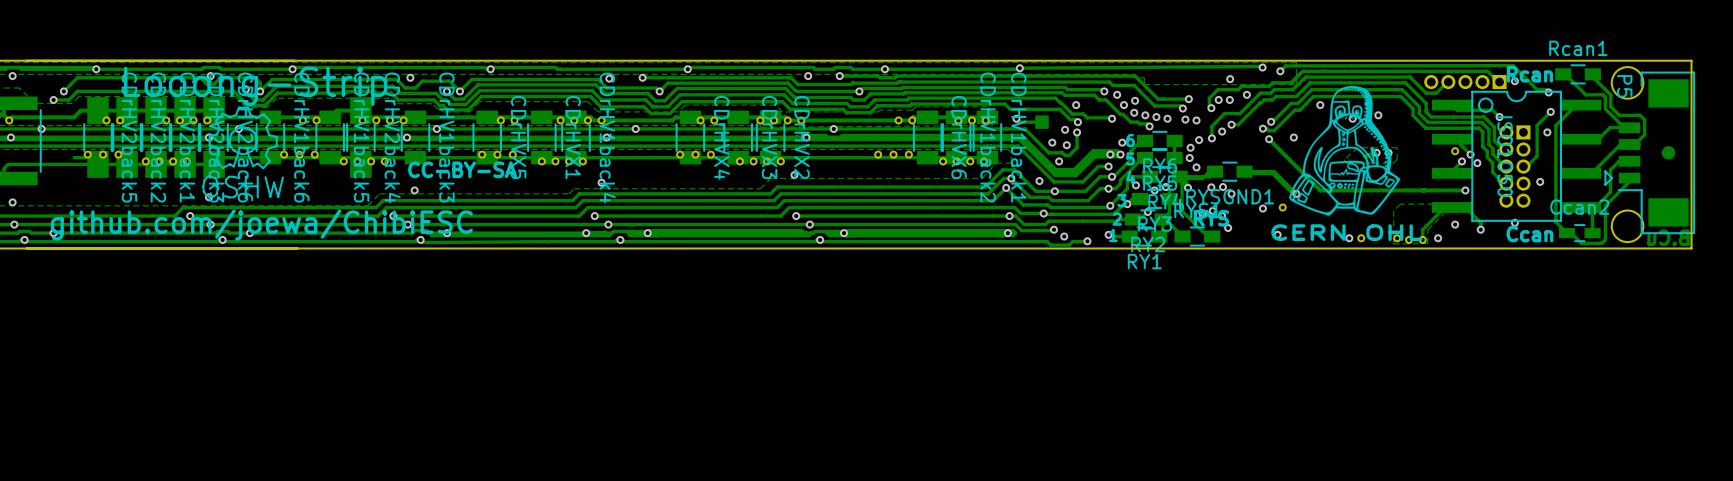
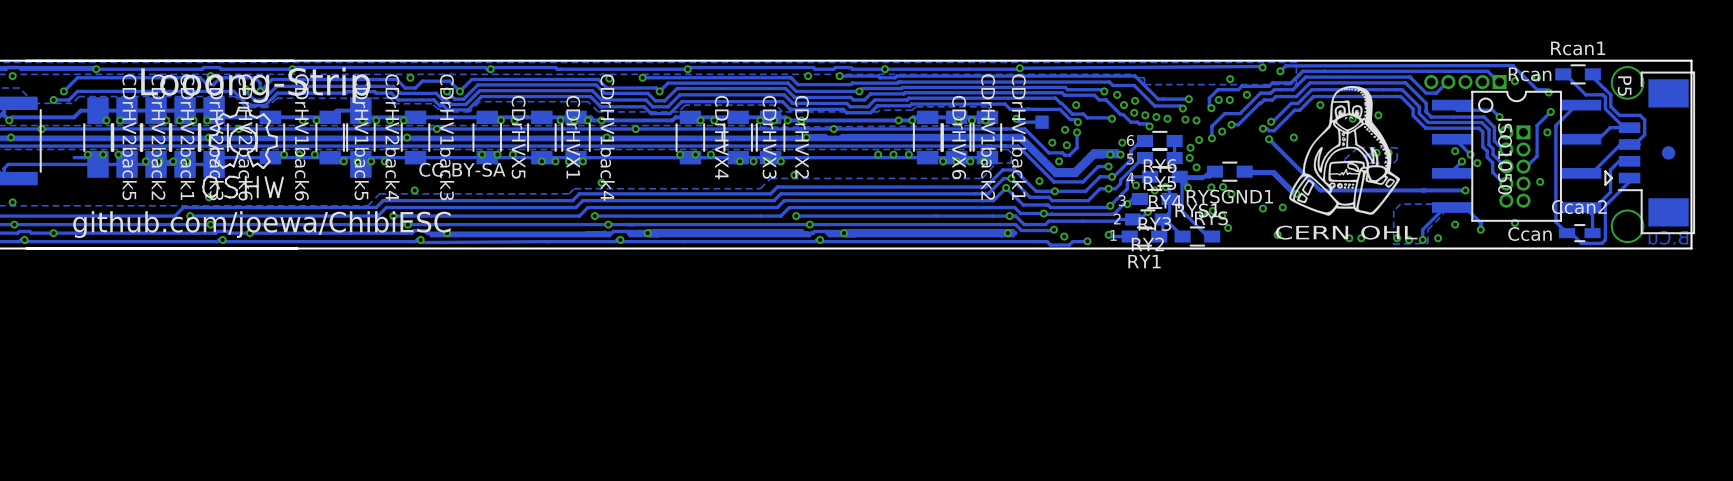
via: (586, 233) -> none

